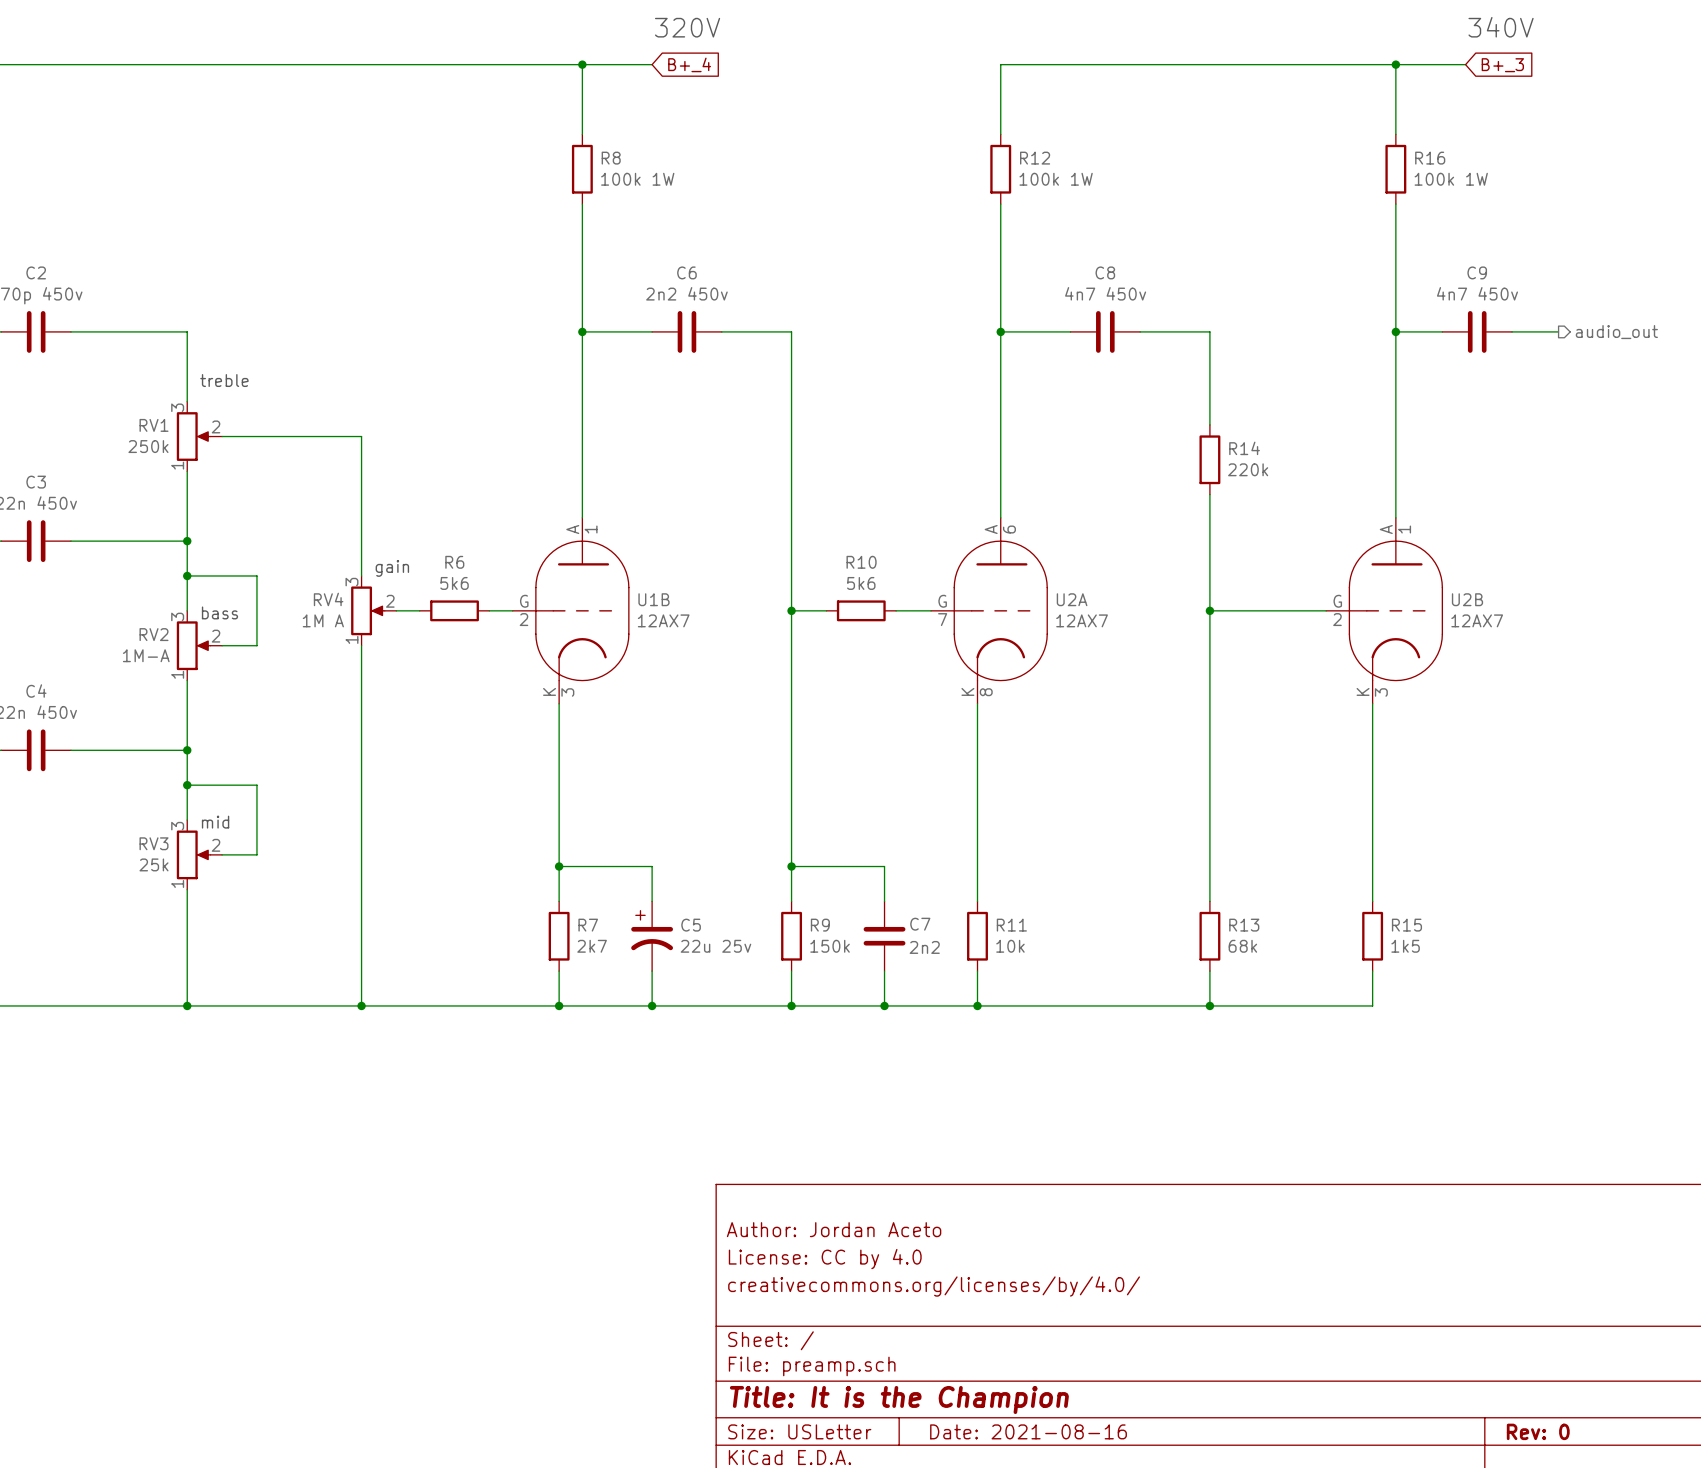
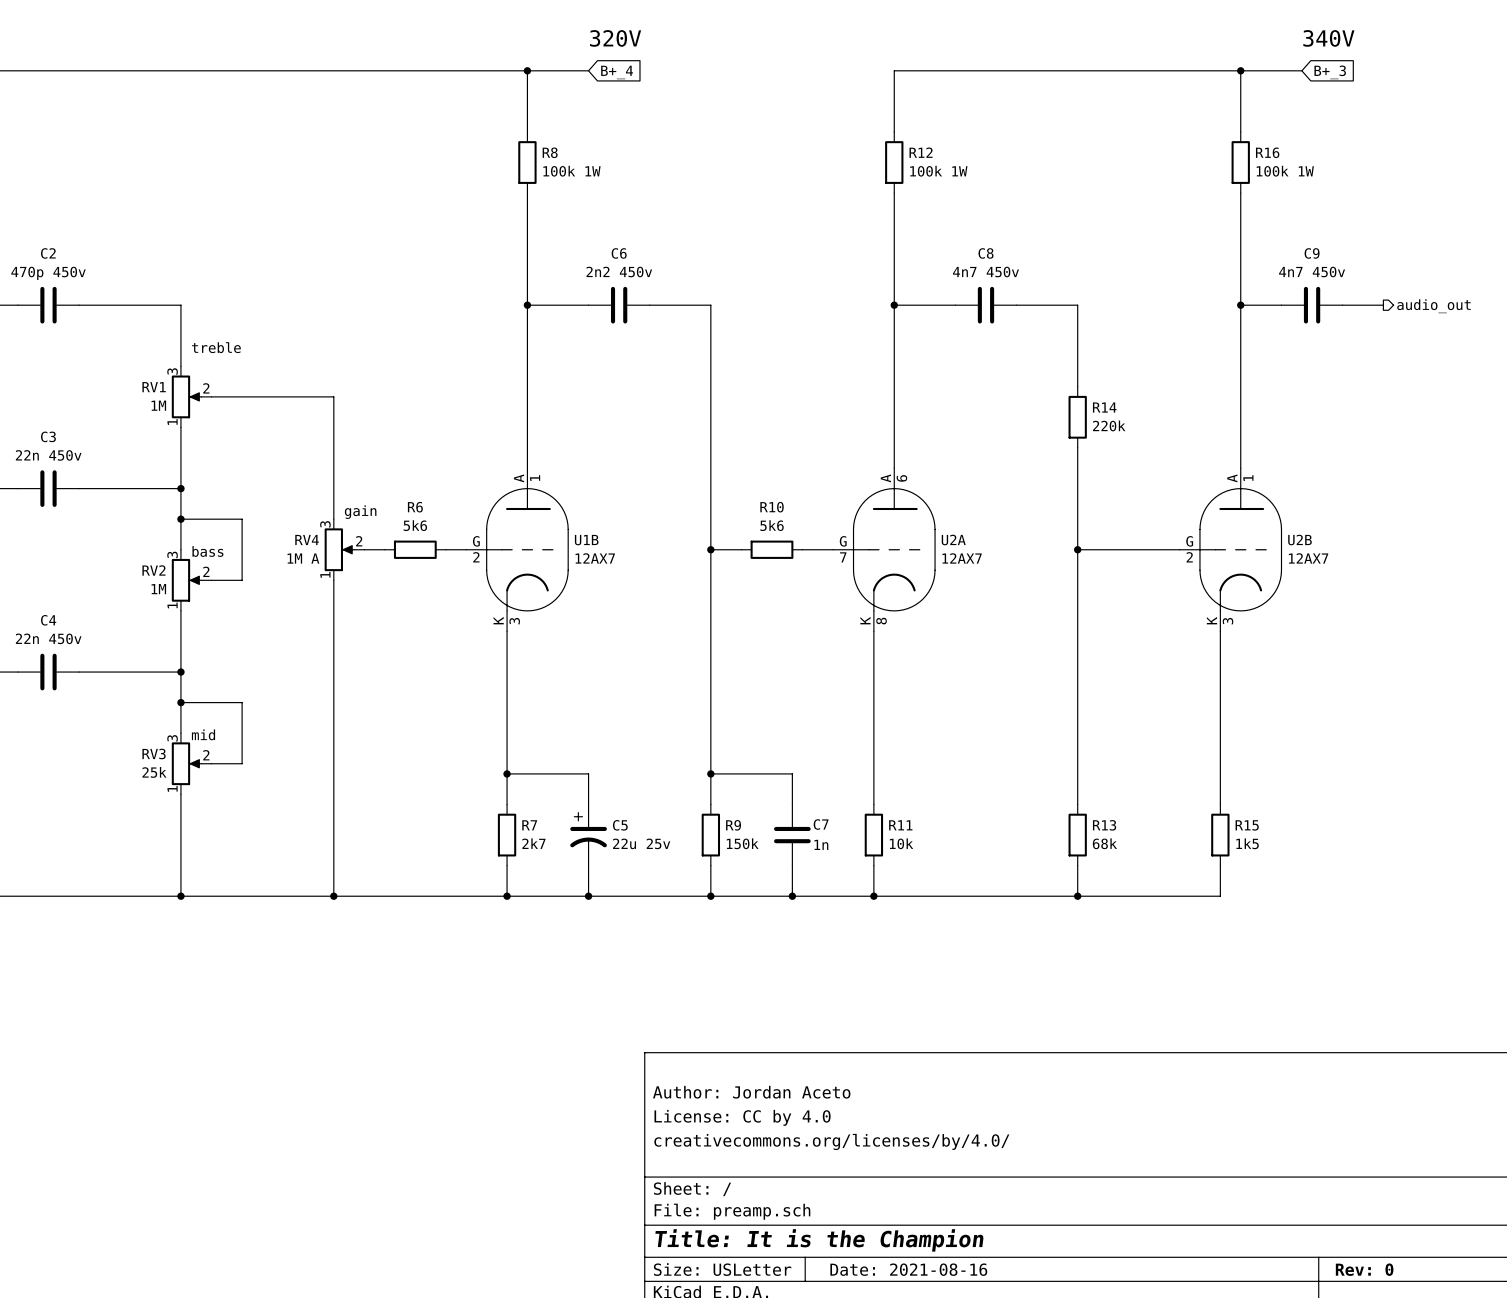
RV1 value: 250k (148, 446) -> 1M (158, 405)
RV2 value: 1M-A (146, 655) -> 1M (158, 589)
C7 value: 2n2 (924, 947) -> 1n (821, 844)

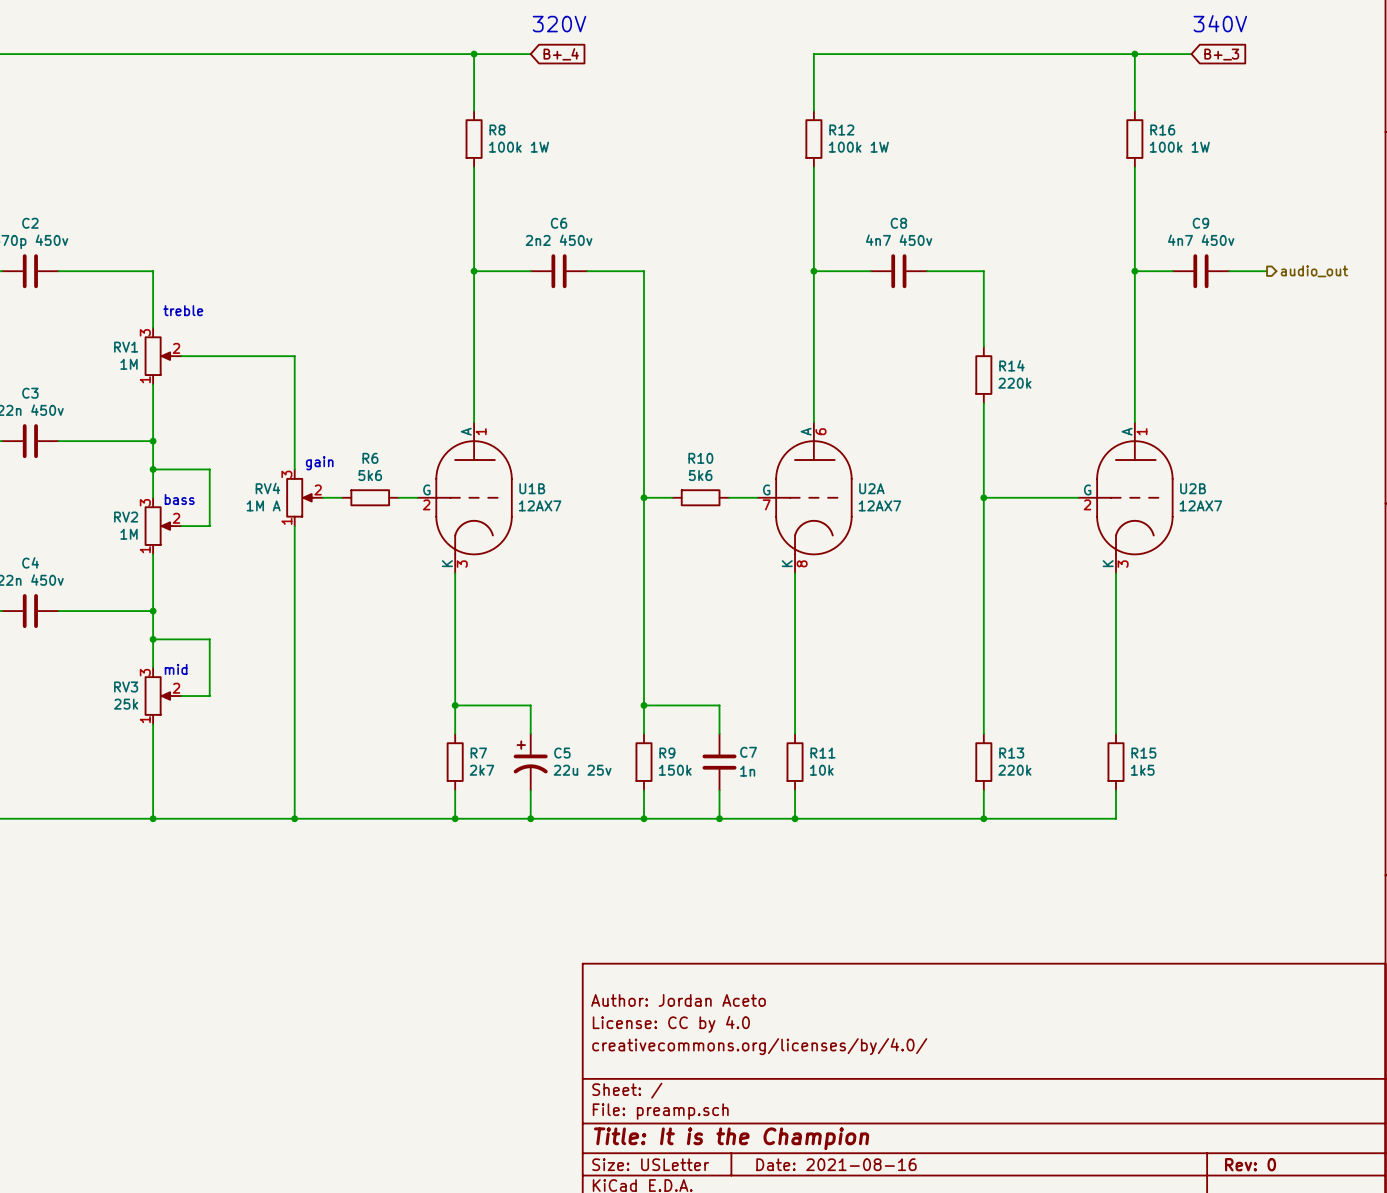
R13 value: 68k (1104, 843) -> 220k (1014, 770)

